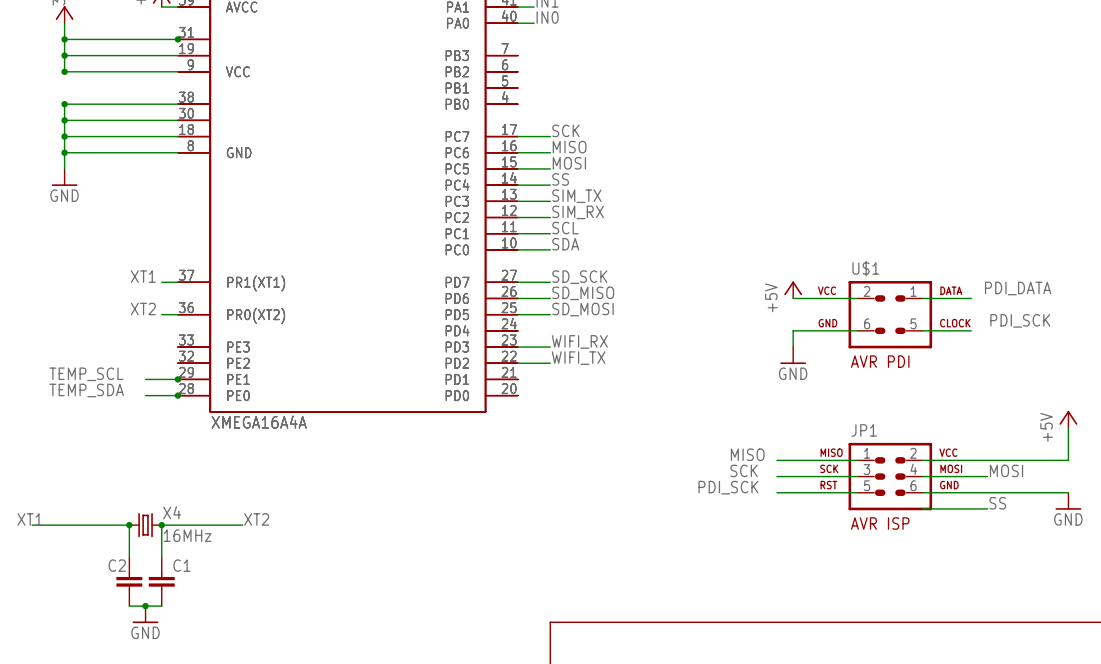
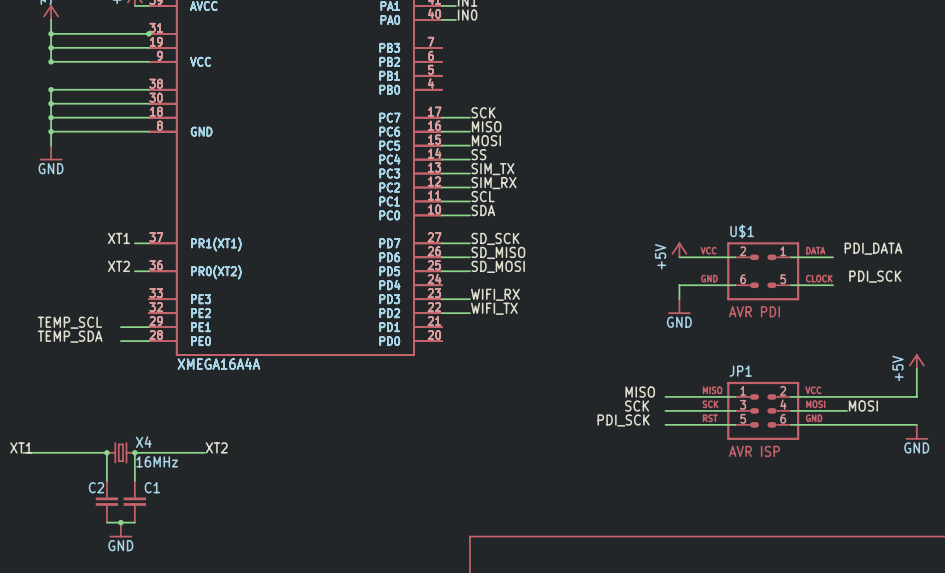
junction: (177, 379) -> none
junction: (177, 395) -> none
label: SS (997, 503) -> none
wire: (922, 508) (987, 508) -> none

